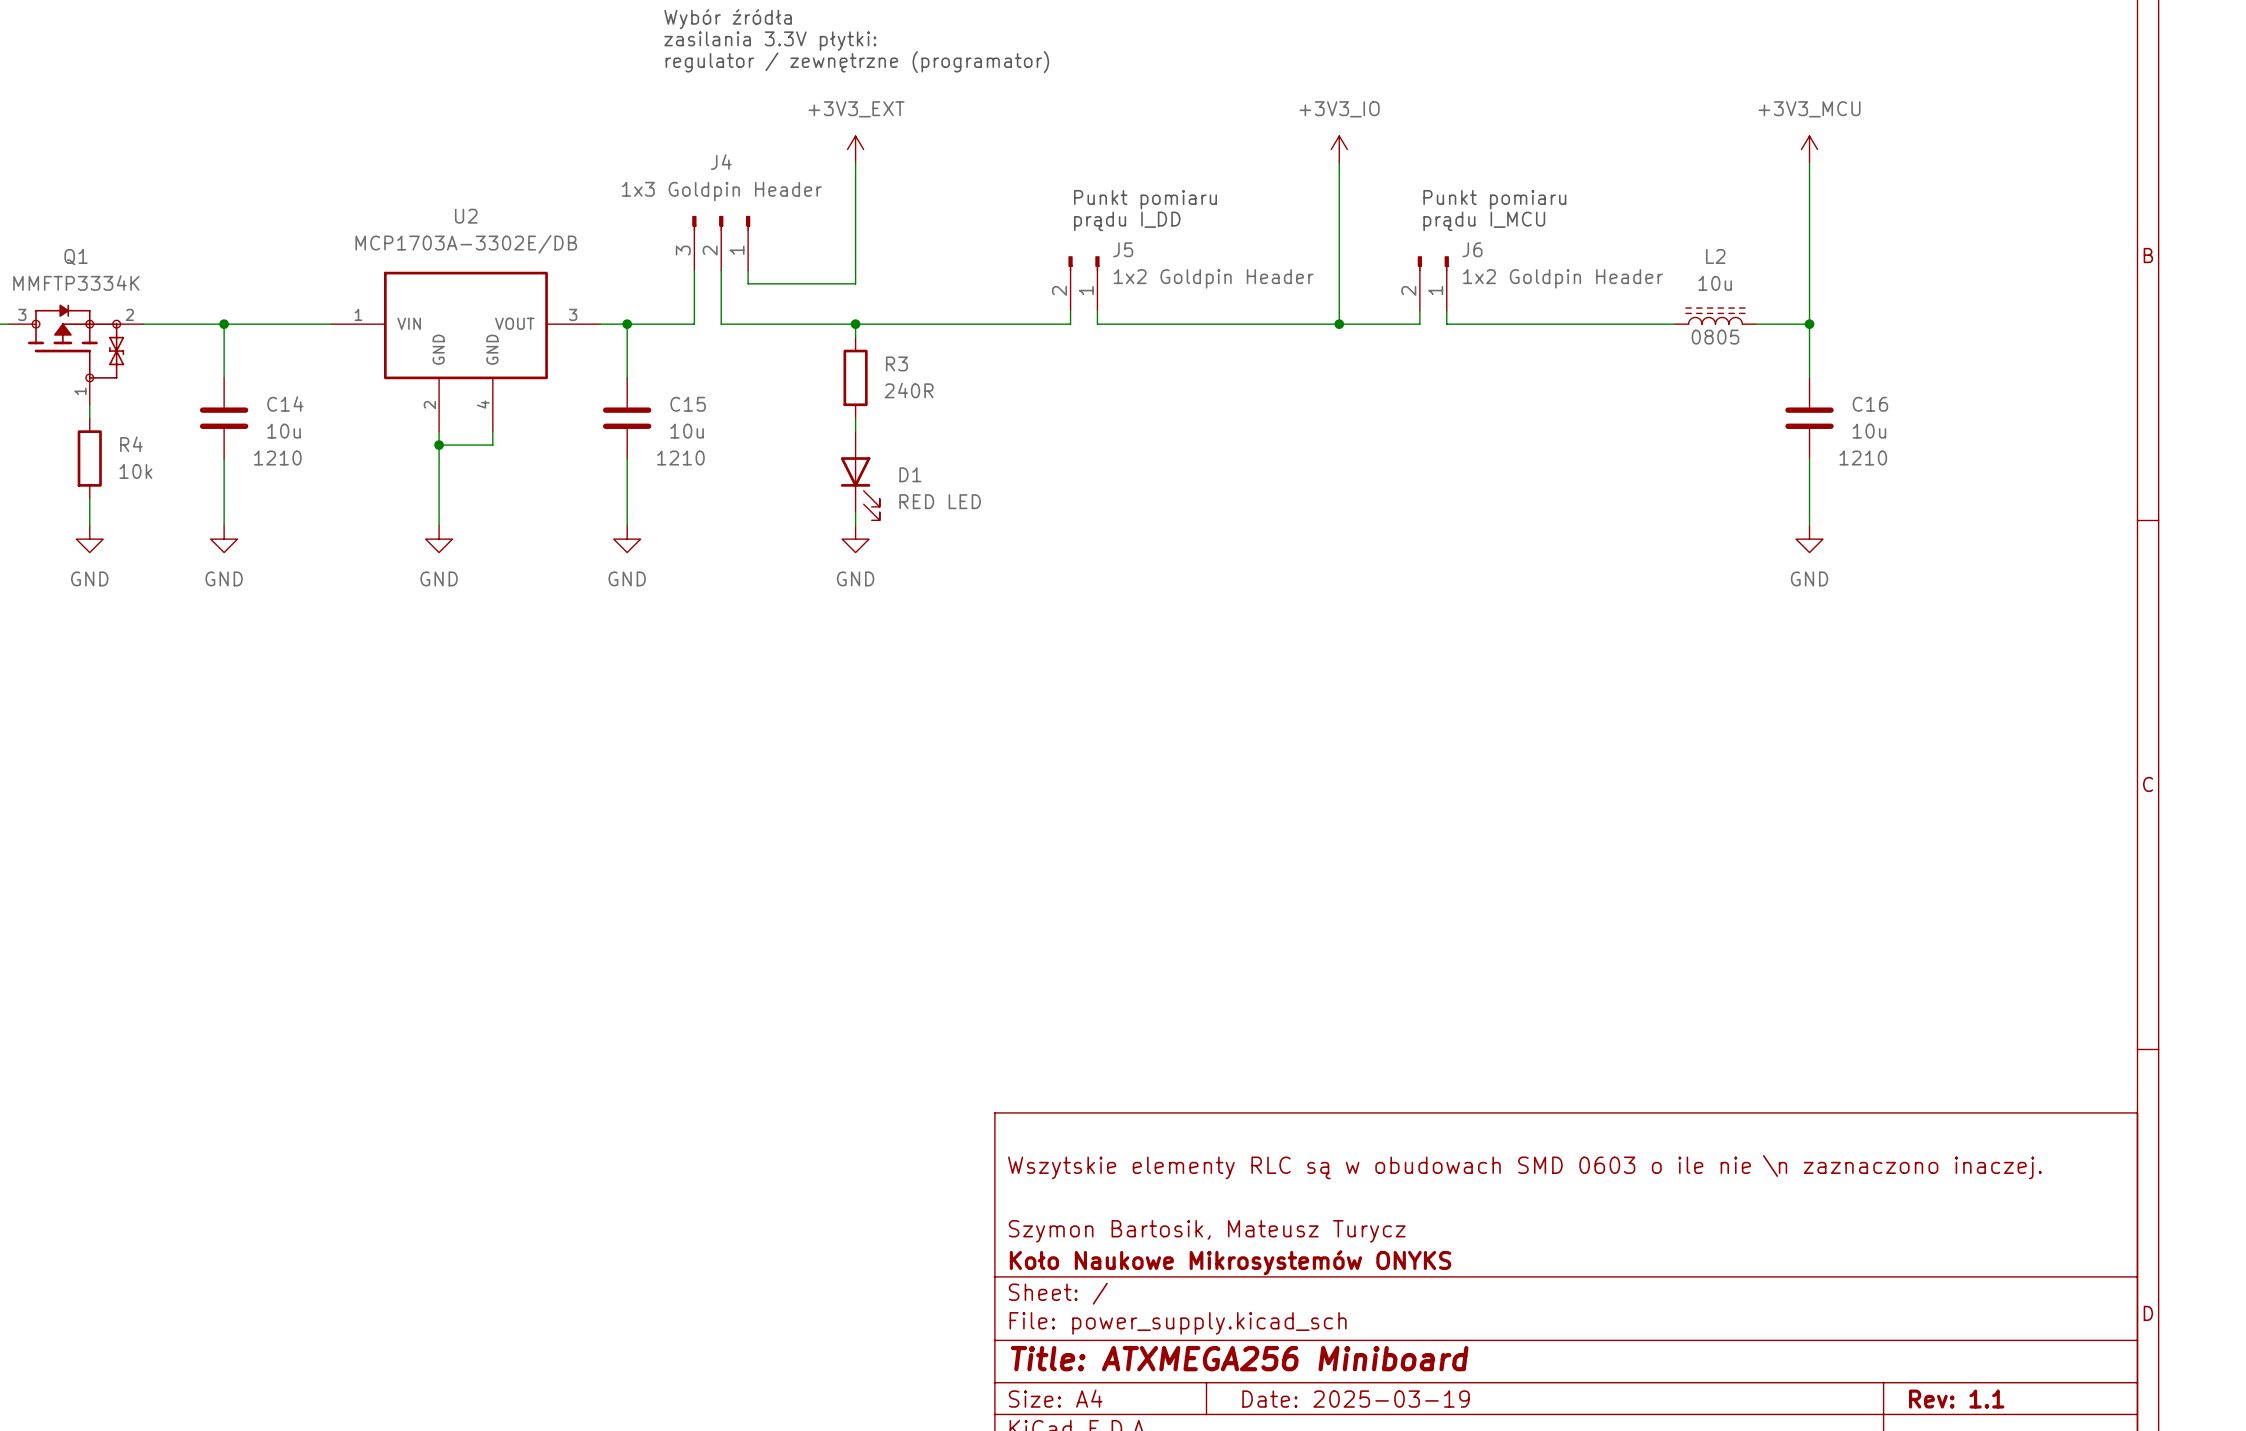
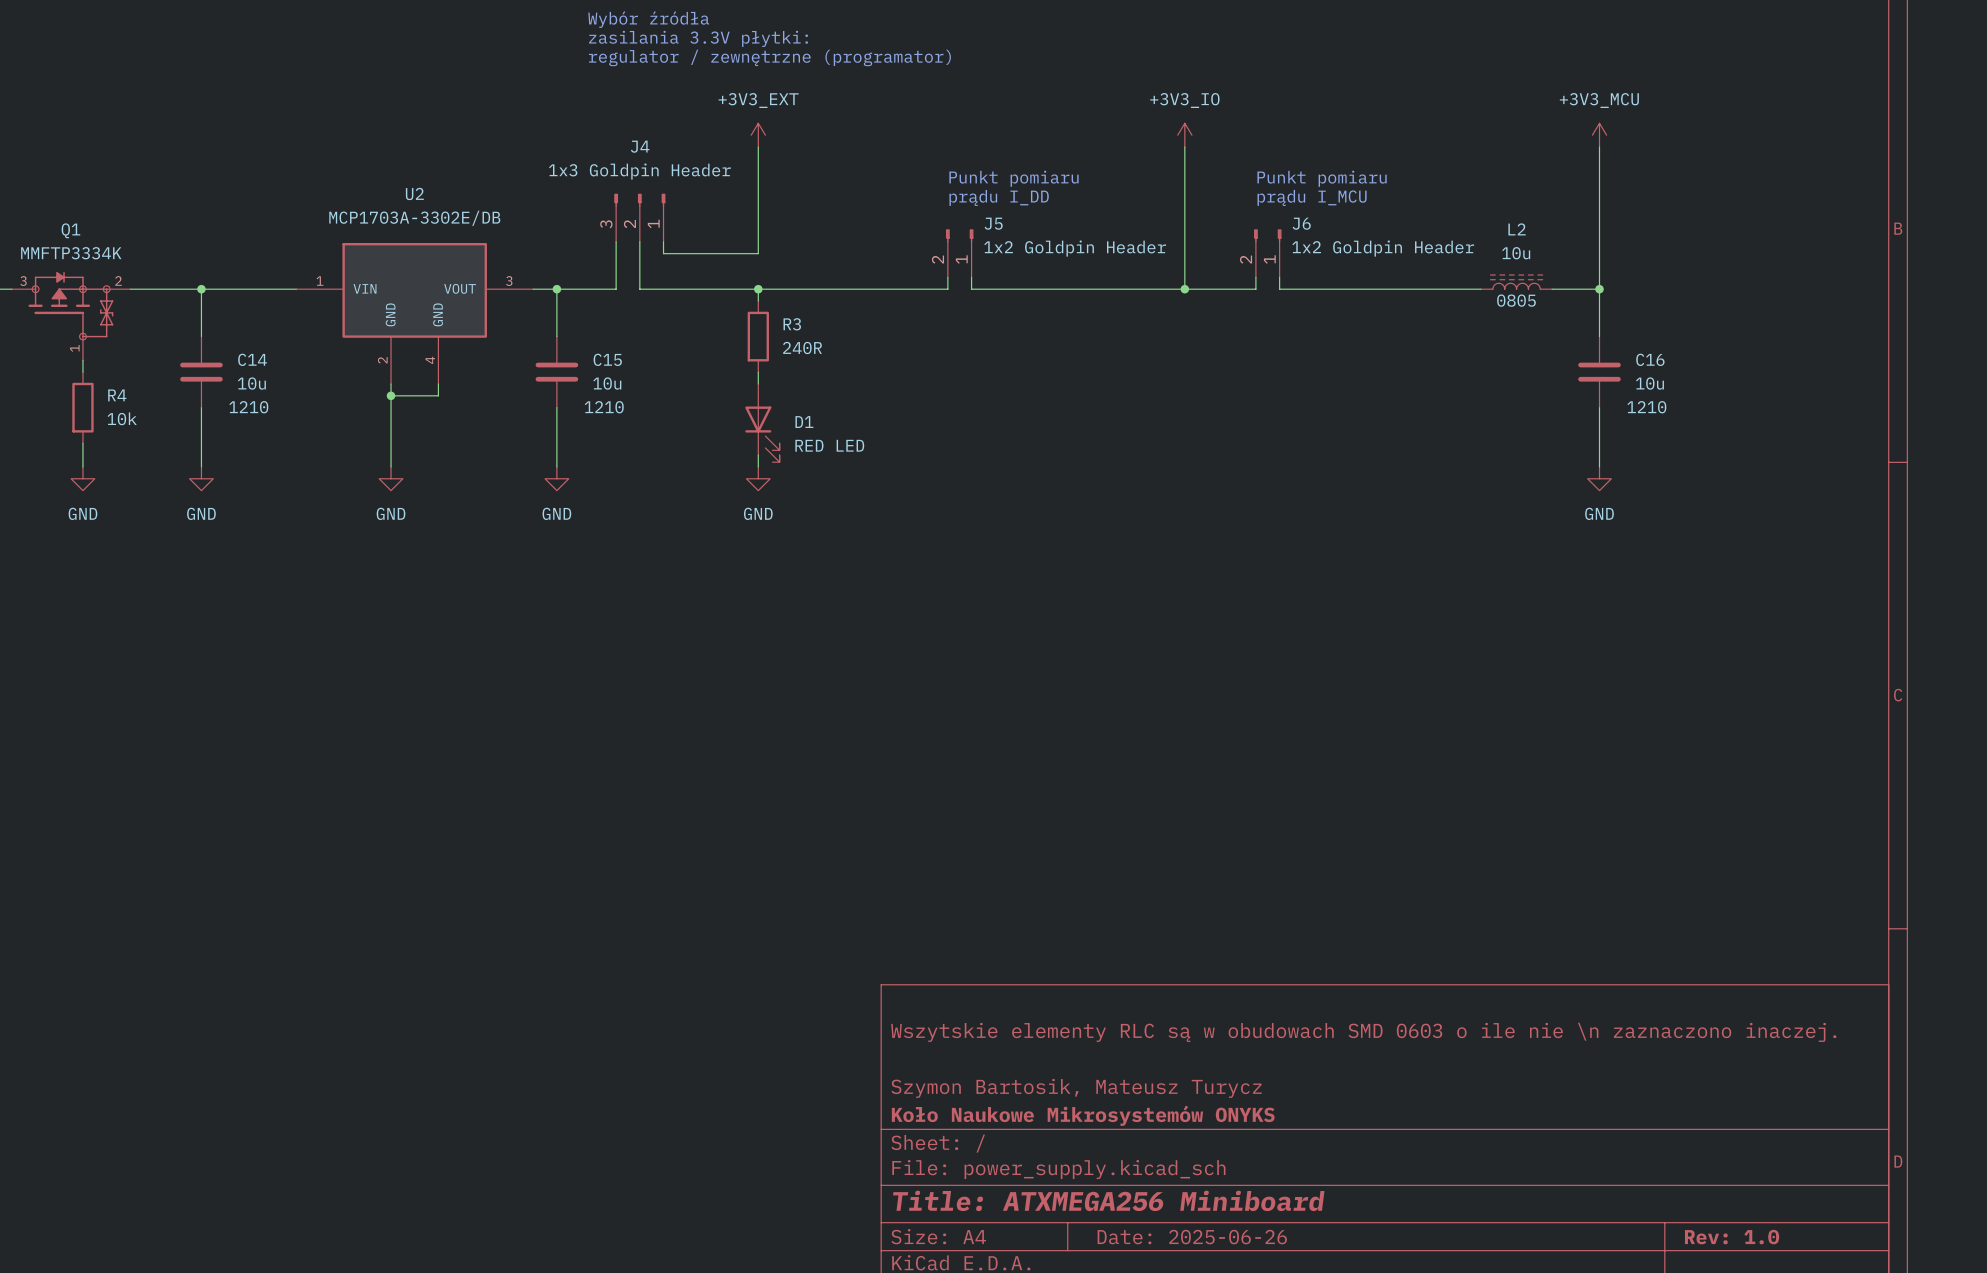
title block: Date: 2025-03-19 (1356, 1399) -> Date: 2025-06-26 (1192, 1237)
title block: Rev: 1.1 (1956, 1399) -> Rev: 1.0 (1732, 1237)

